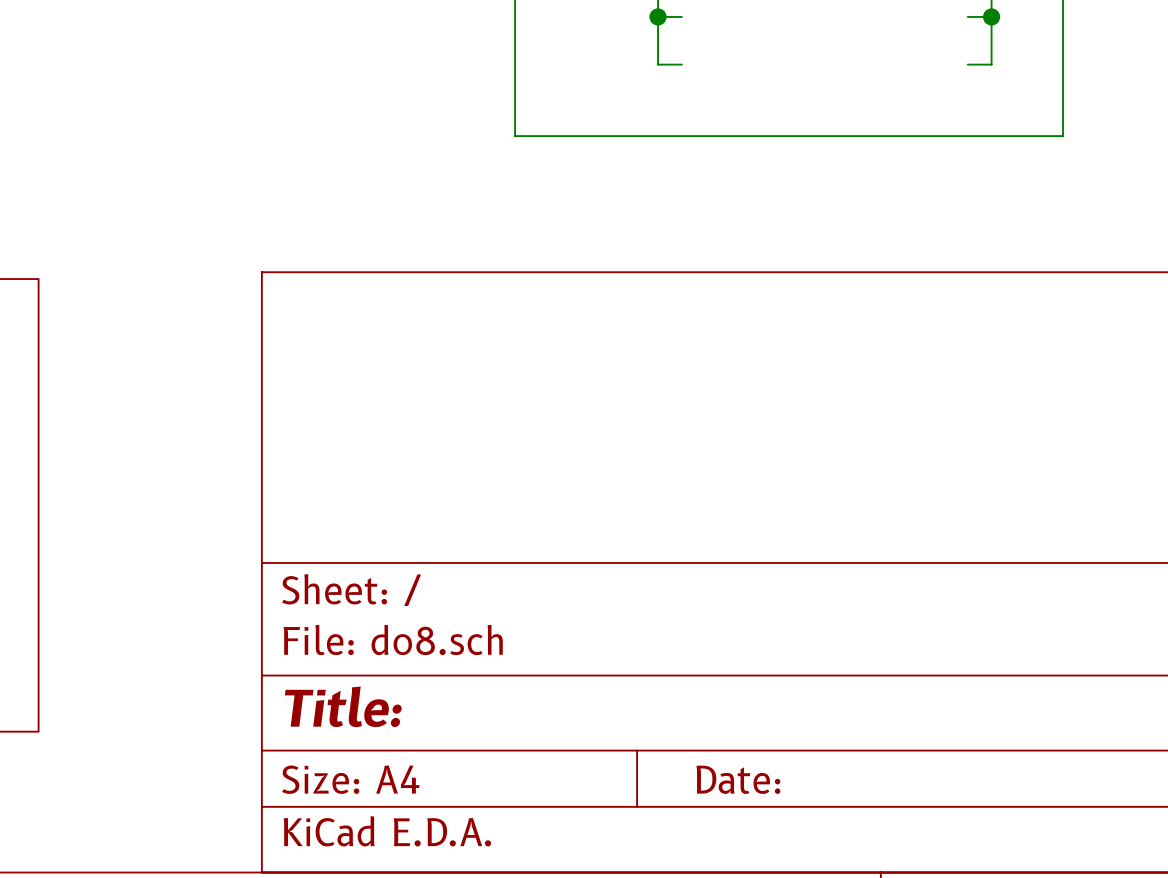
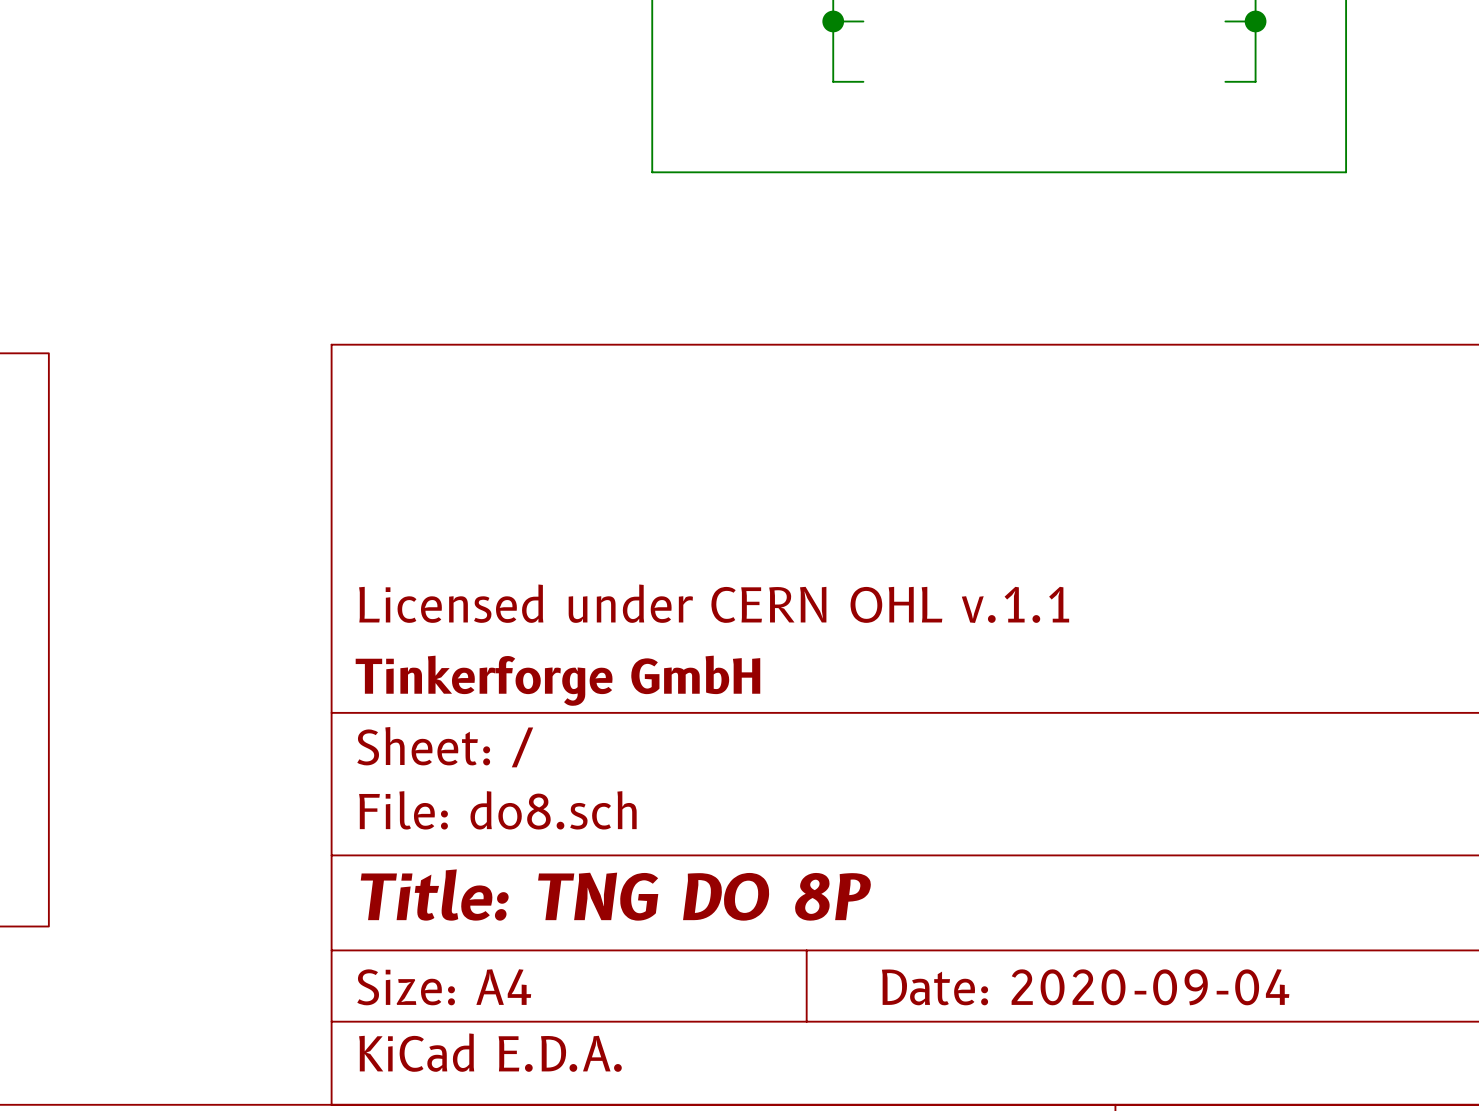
title block: none -> Licensed under CERN OHL v.1.1 (714, 603)
title block: none -> Tinkerforge GmbH (557, 680)
title block: Title: (343, 706) -> Title: TNG DO 8P (615, 895)
title block: Date: (738, 779) -> Date: 2020-09-04 (1085, 987)

